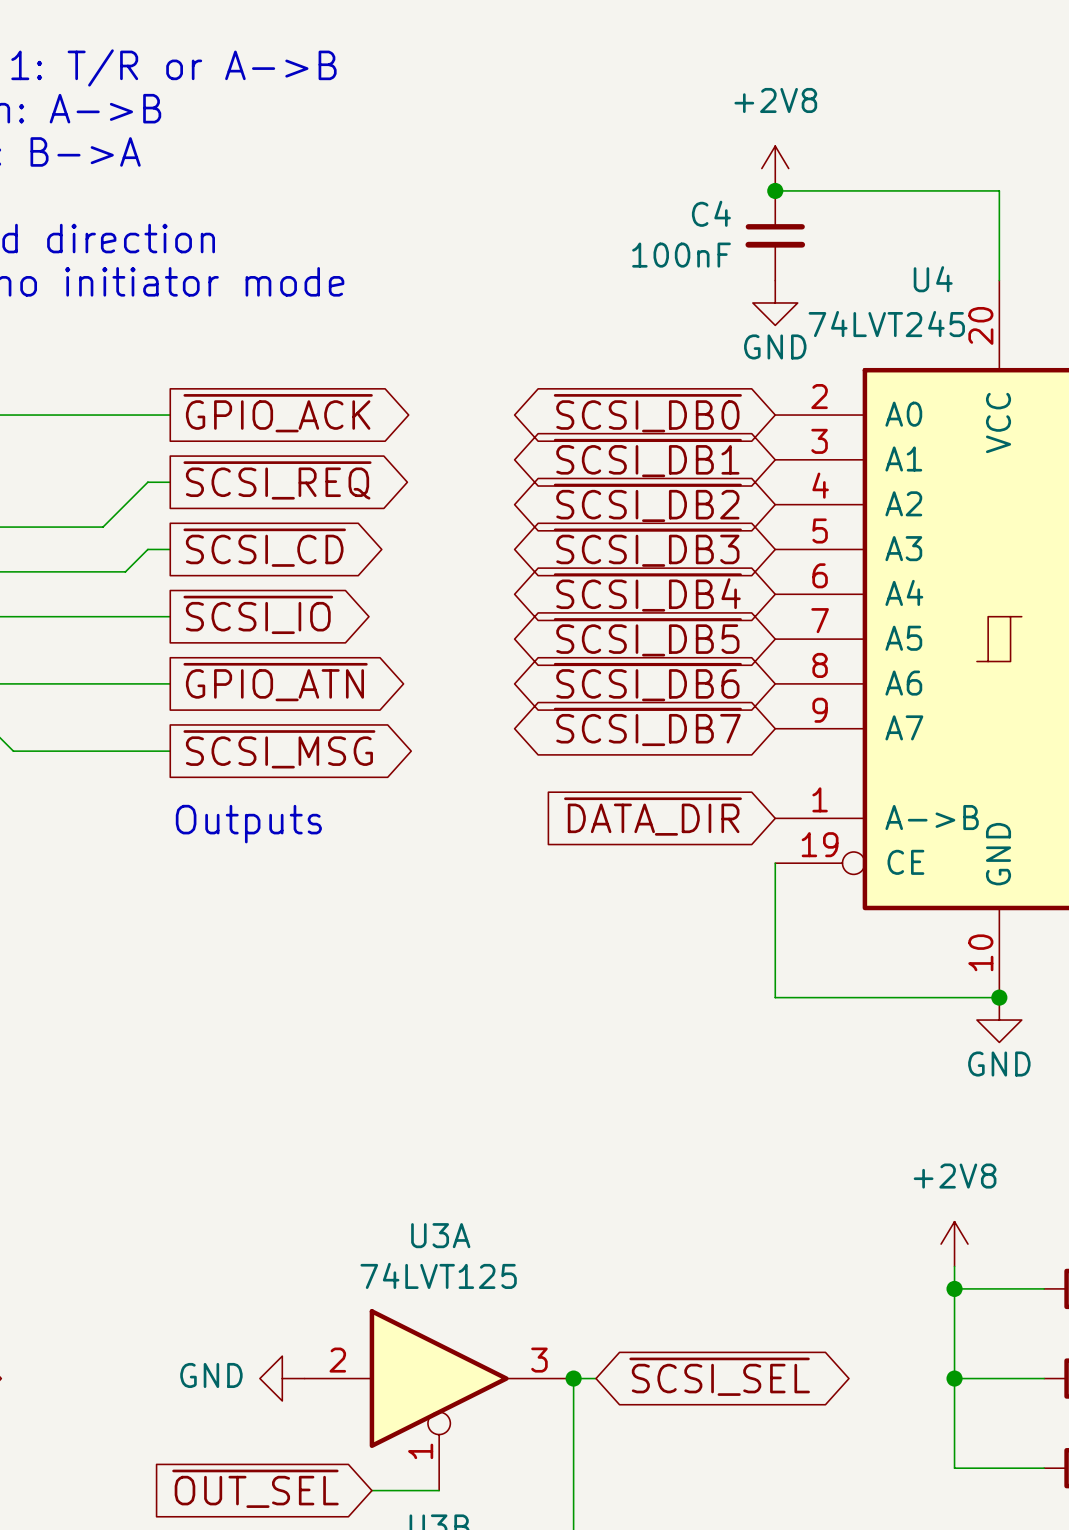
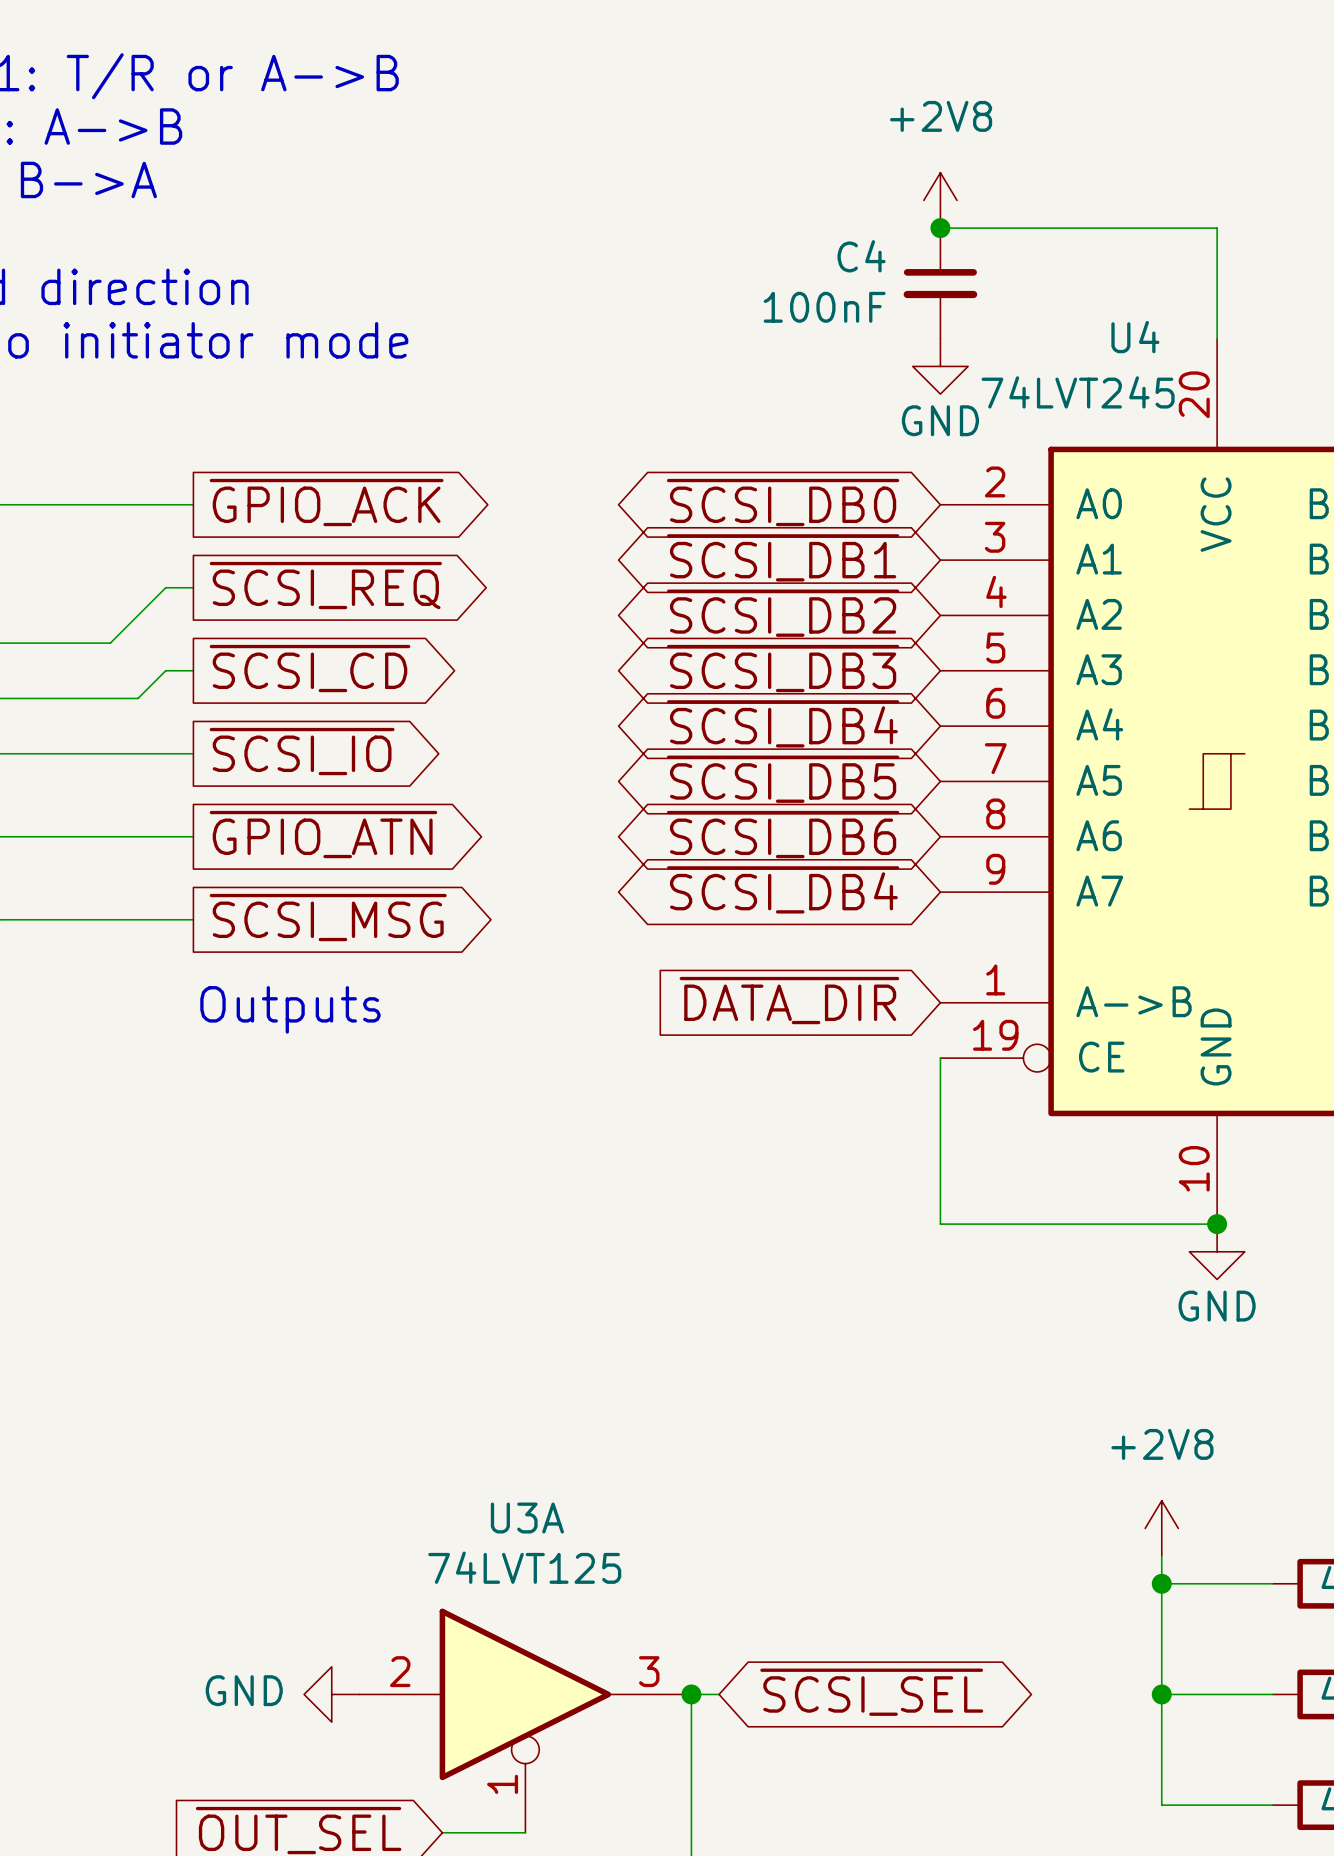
global label: ~{SCSI_DB7} (647, 726) -> ~{SCSI_DB4} (783, 889)

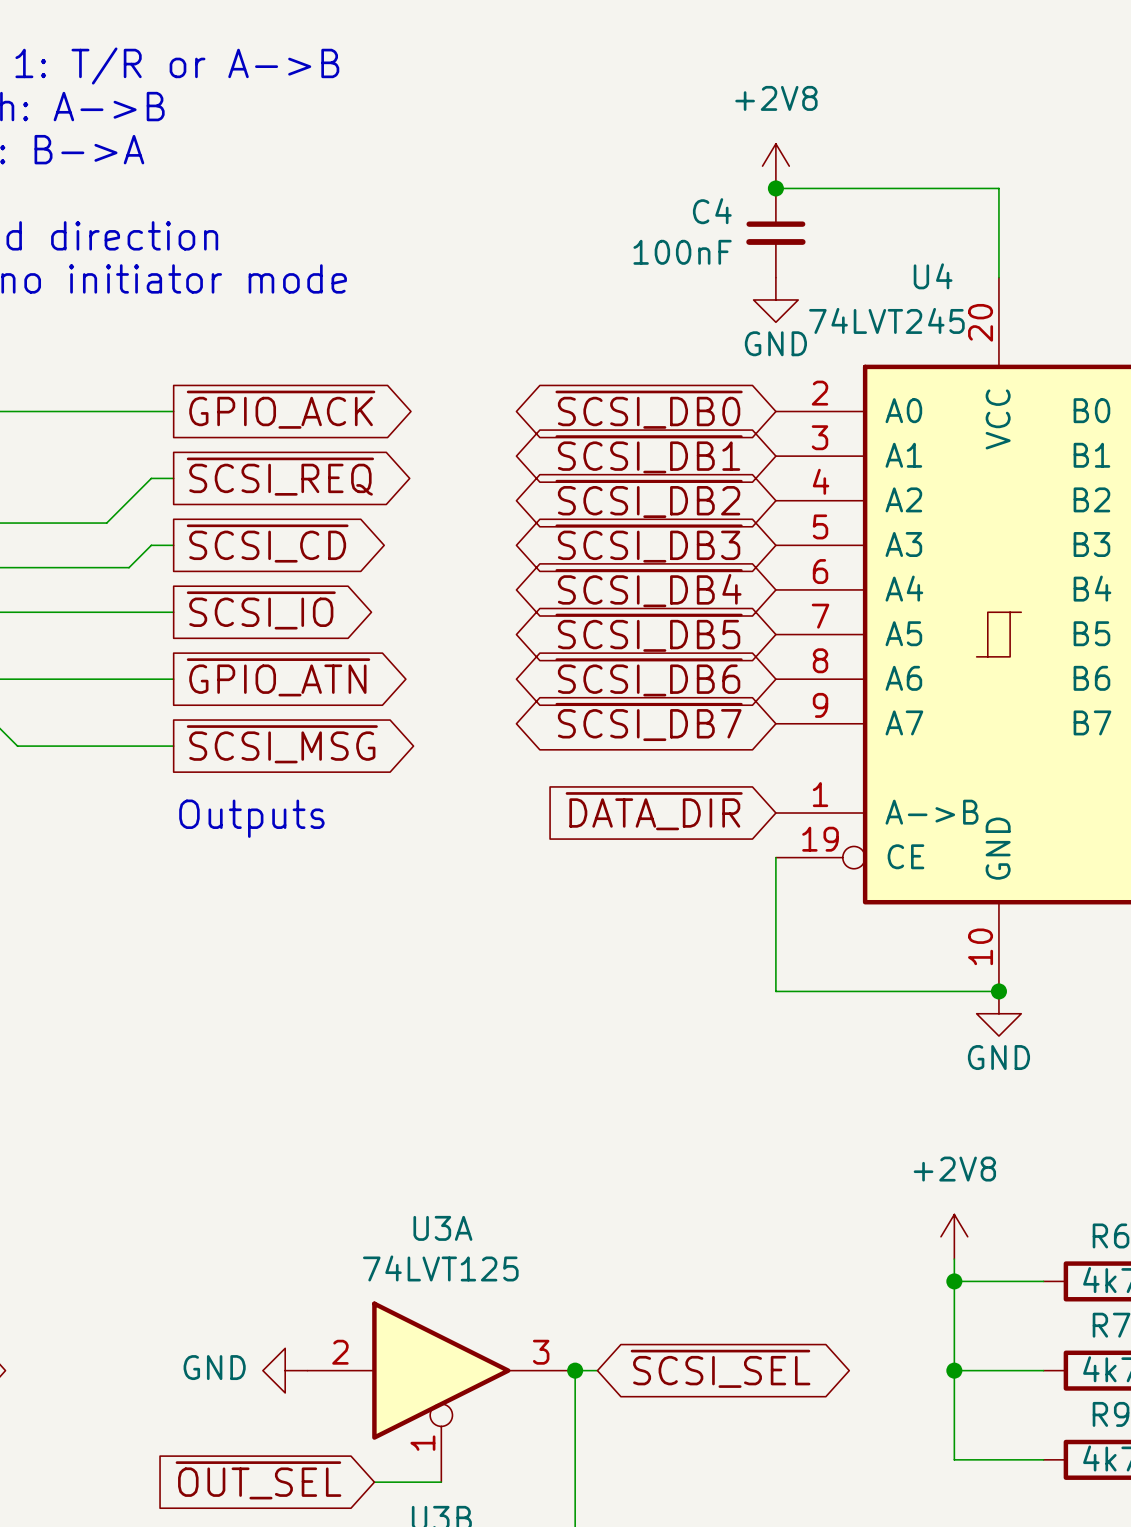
global label: ~{SCSI_DB4} (783, 889) -> ~{SCSI_DB7} (649, 721)

